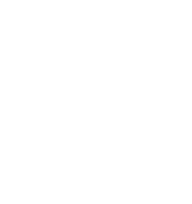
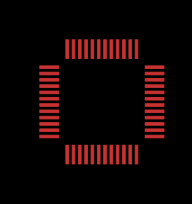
part: none -> (101, 101)

